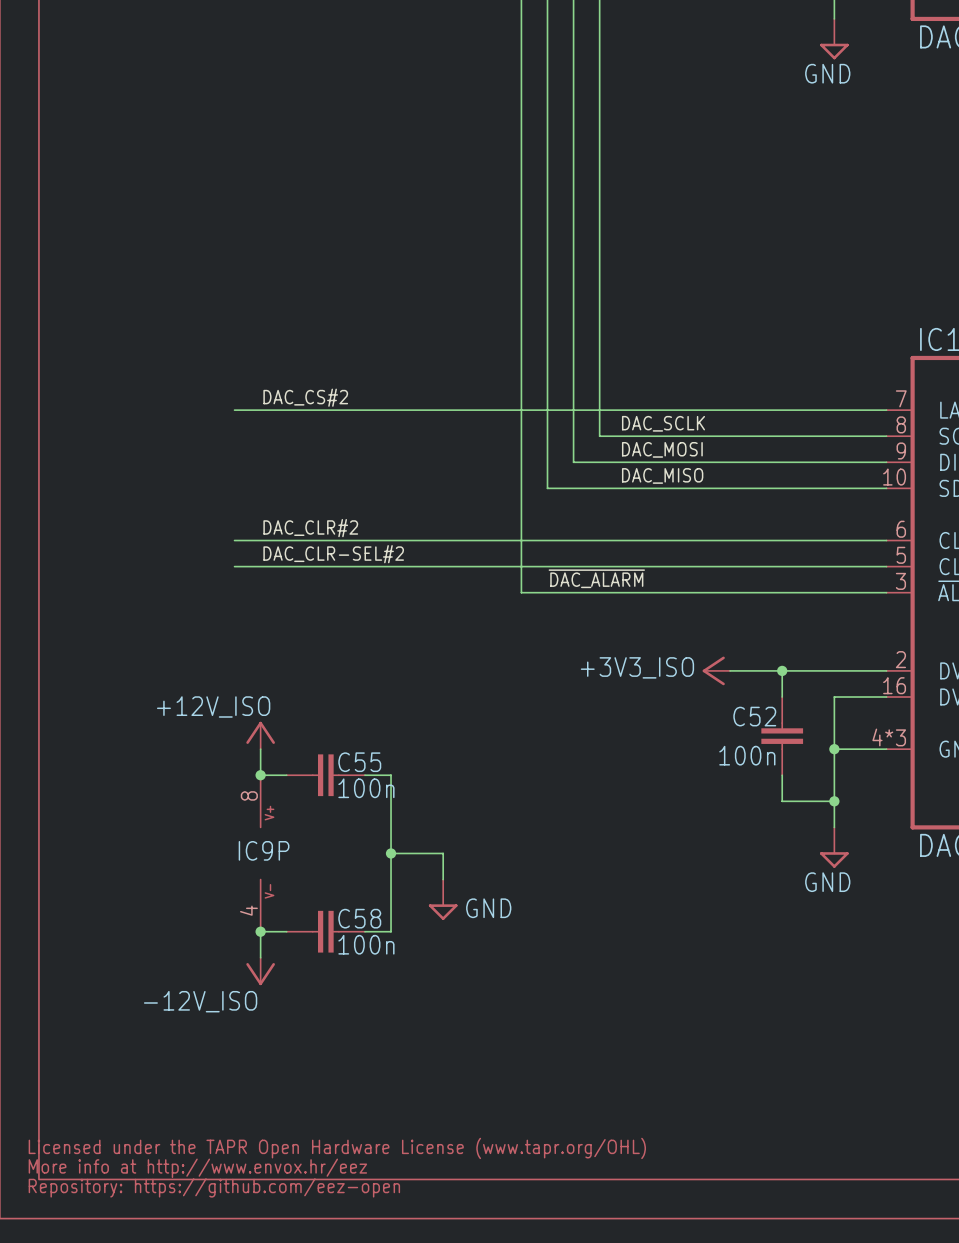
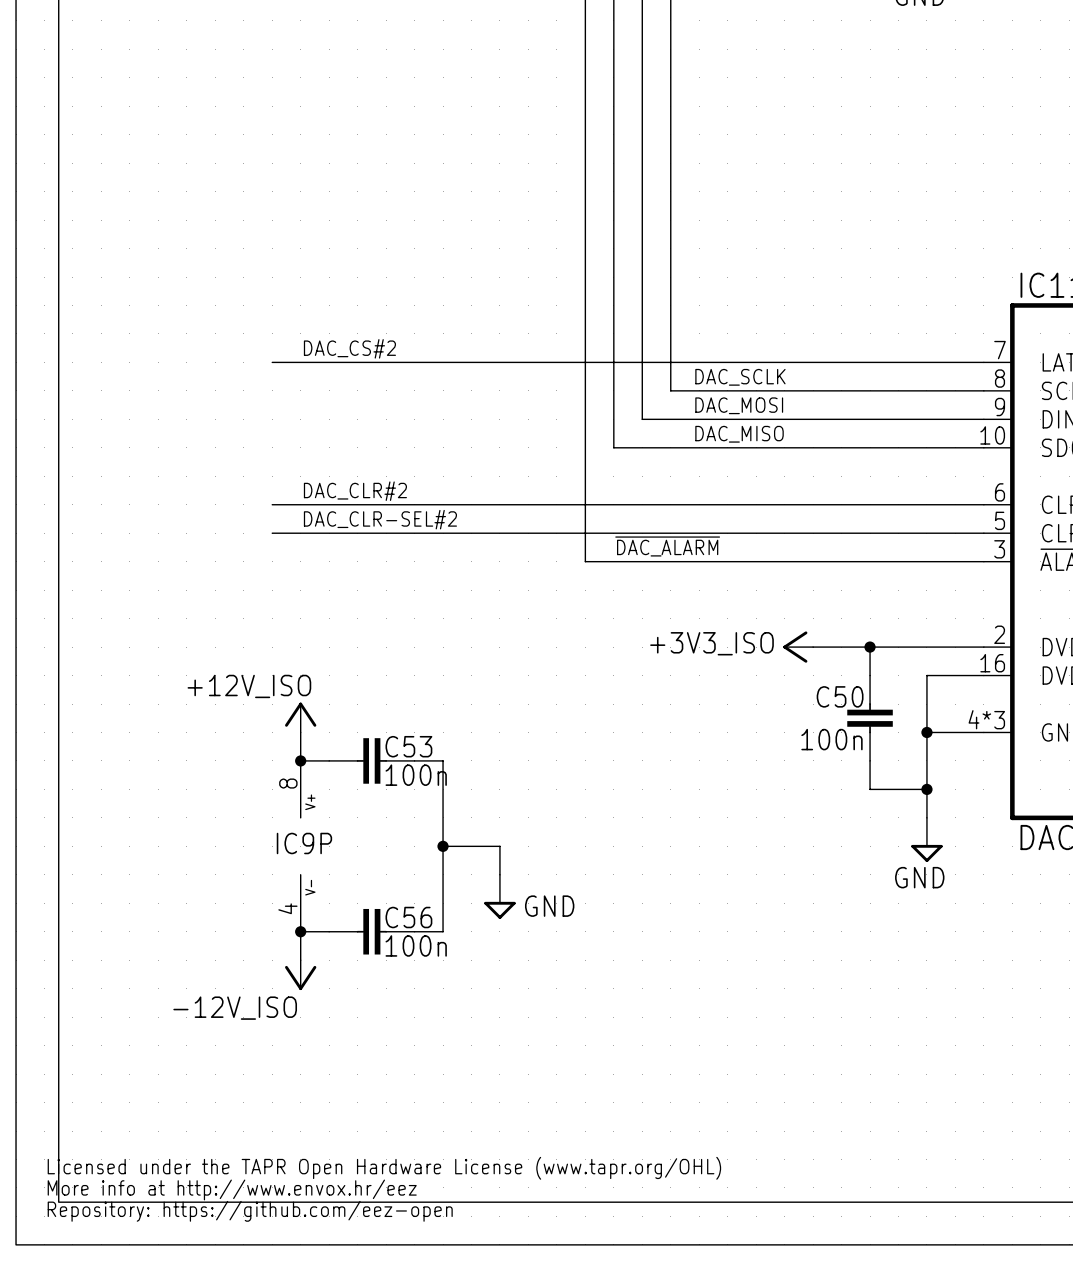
C52 name: C52 (754, 716) -> C50 (840, 696)
C55 name: C55 (359, 762) -> C53 (408, 746)
C58 name: C58 (359, 918) -> C56 (408, 917)

